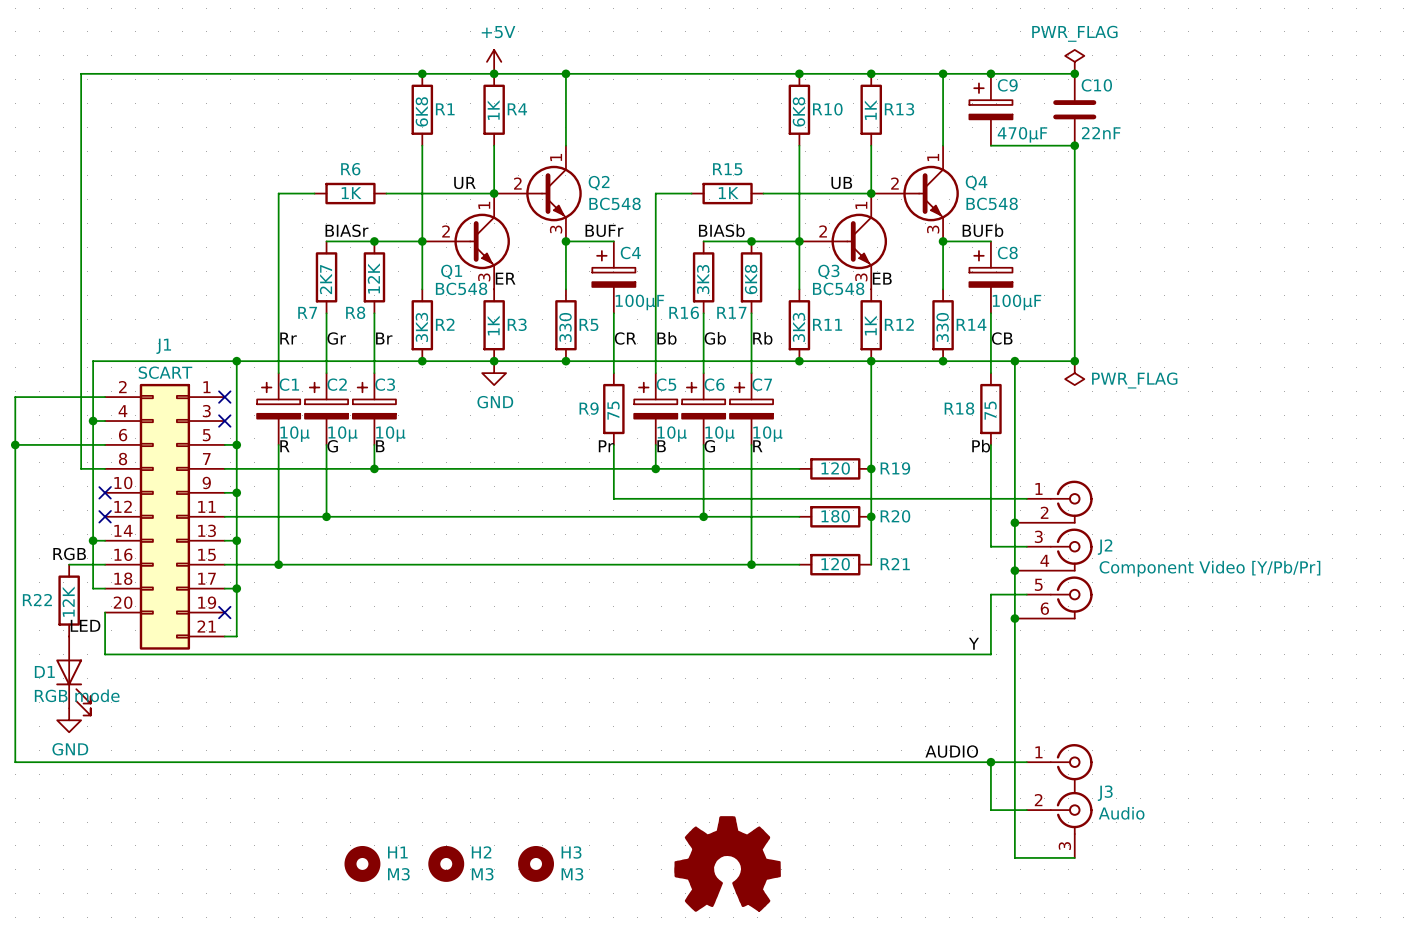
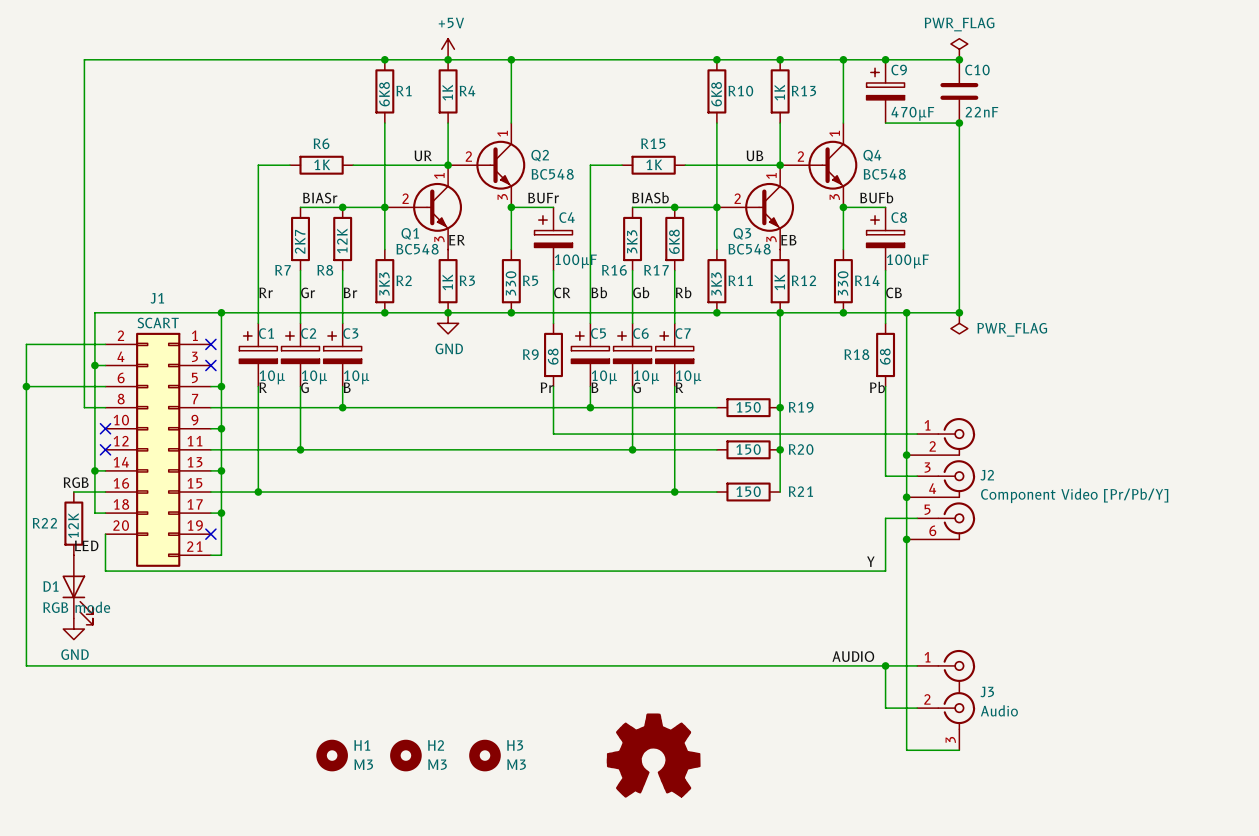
R9 value: 75 (613, 410) -> 68 (553, 356)
R18 value: 75 (990, 410) -> 68 (885, 356)
R19 value: 120 (835, 468) -> 150 (748, 407)
R20 value: 180 (835, 516) -> 150 (748, 449)
R21 value: 120 (835, 564) -> 150 (748, 491)
J2 value: Component Video [Y/Pb/Pr] (1209, 568) -> Component Video [Pr/Pb/Y] (1074, 495)

